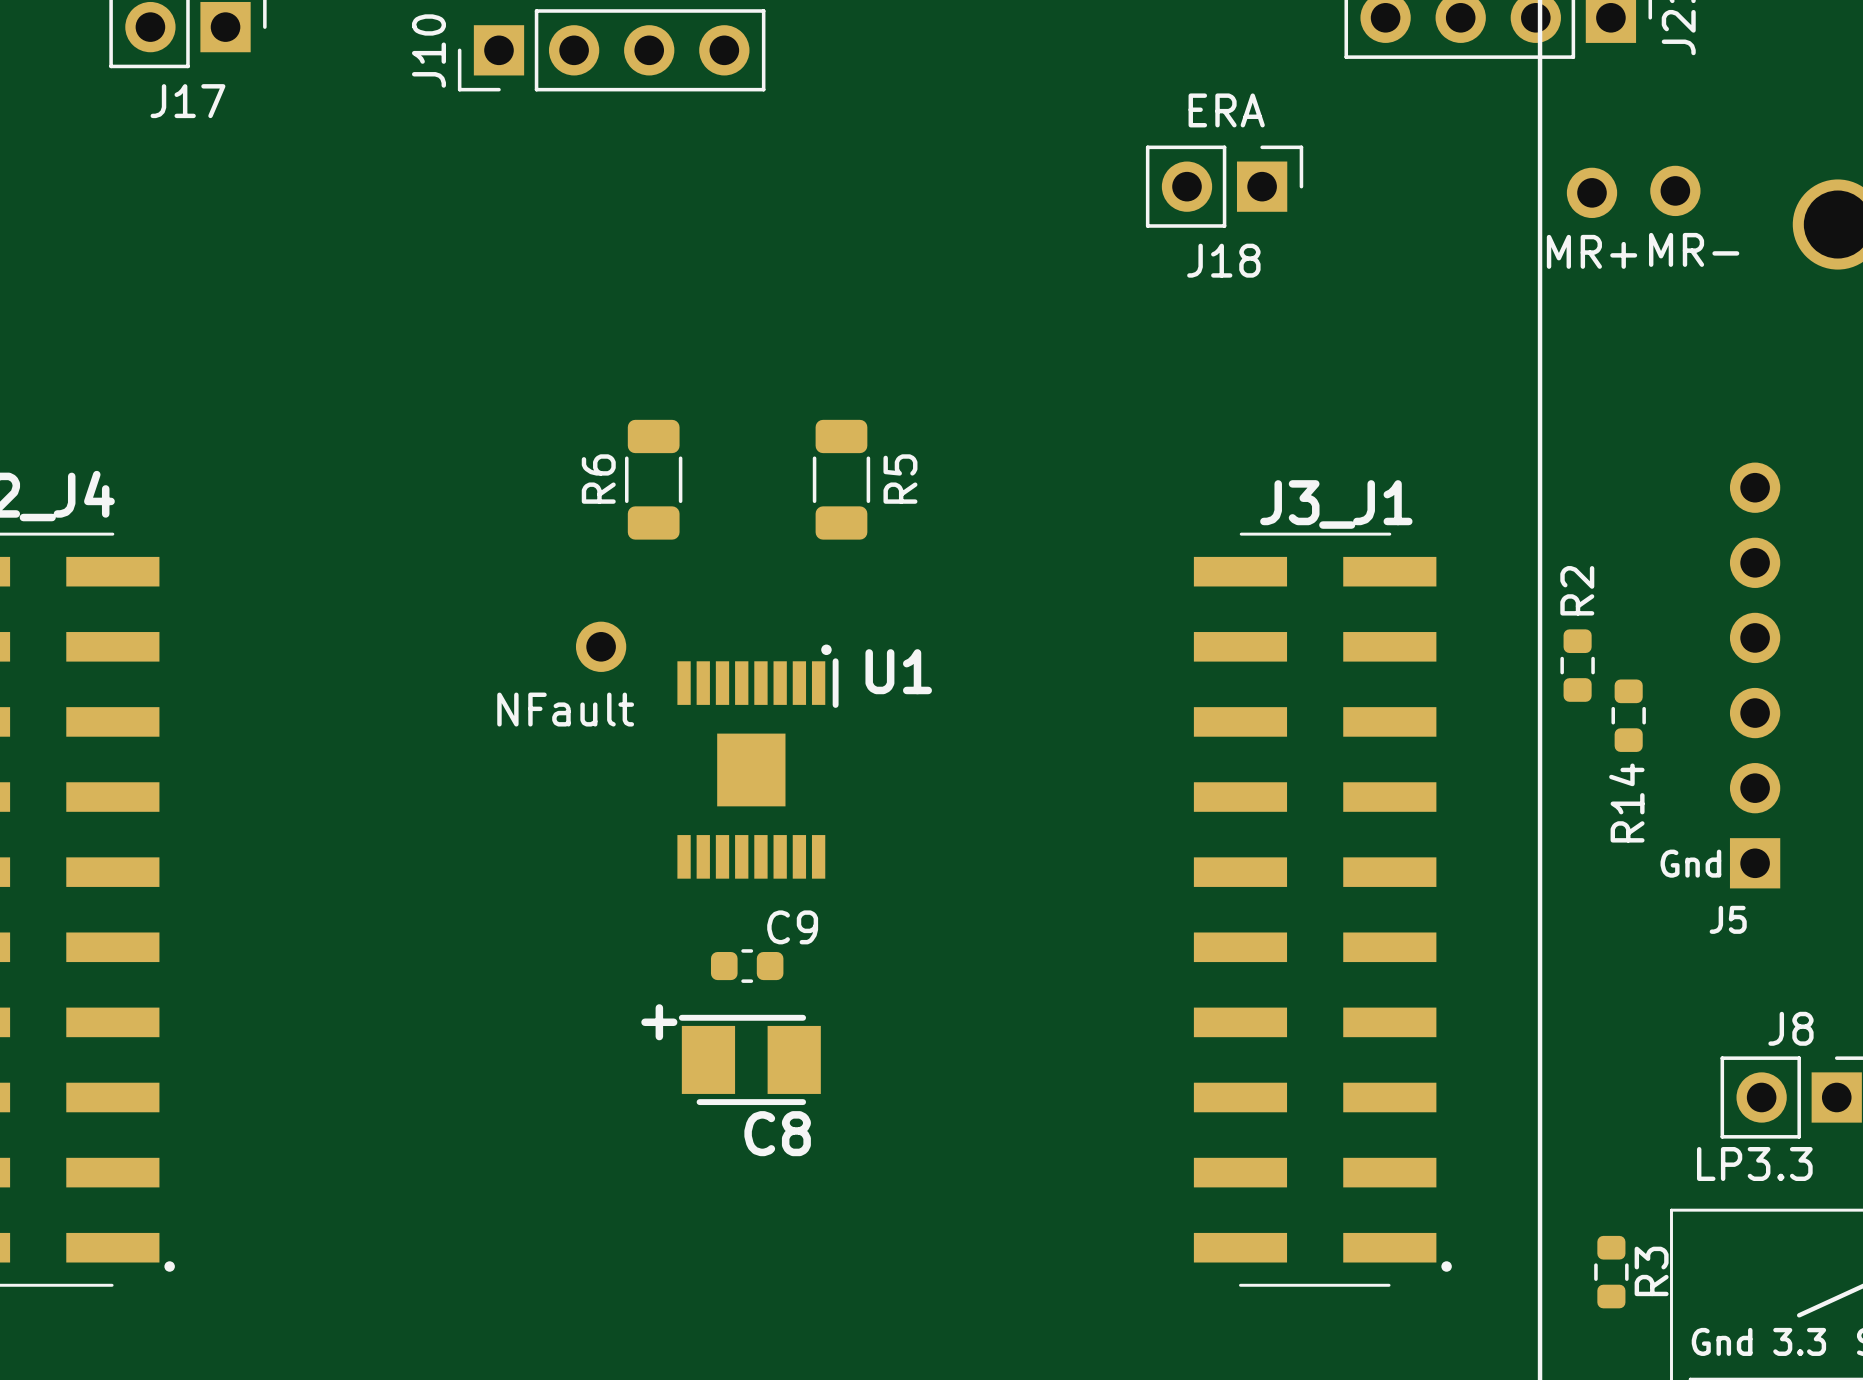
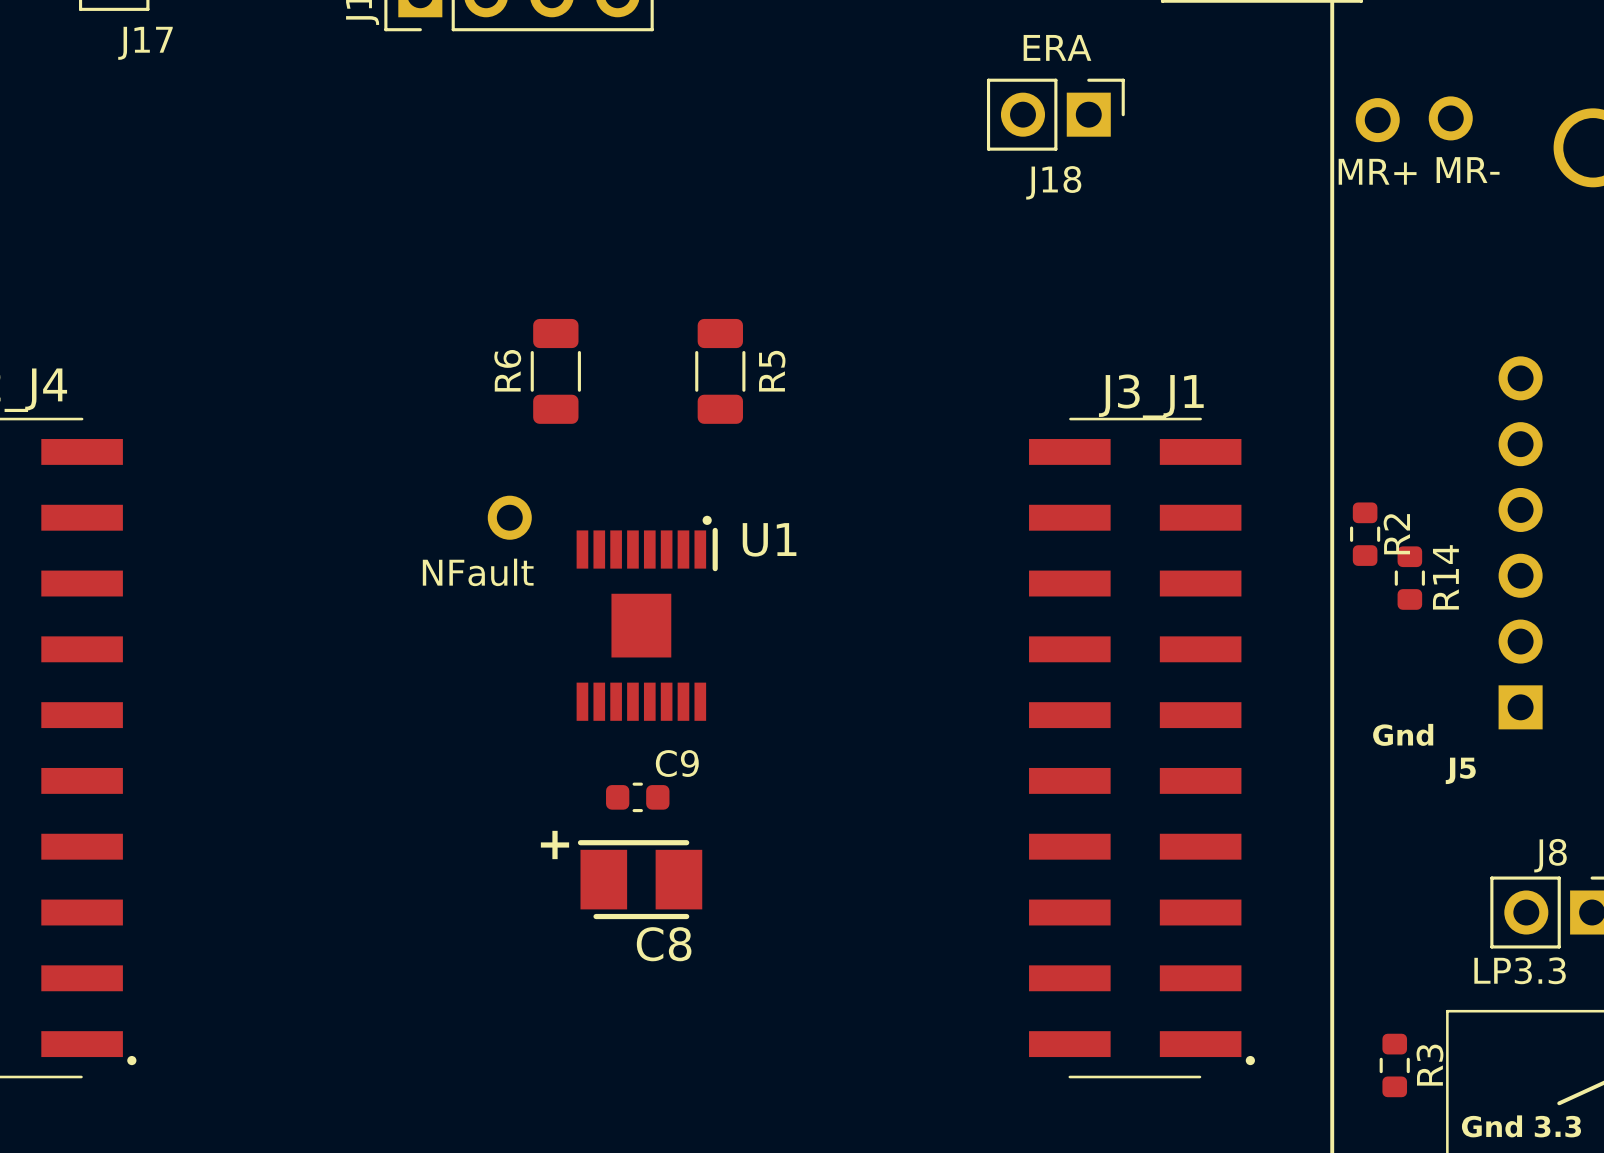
R2 name position: R2 (1577, 590) -> R2 (1396, 534)
R14 name position: R14 (1626, 803) -> R14 (1445, 577)
text position: Gnd (1690, 863) -> Gnd (1403, 734)
text position: J5 (1728, 919) -> J5 (1460, 770)

